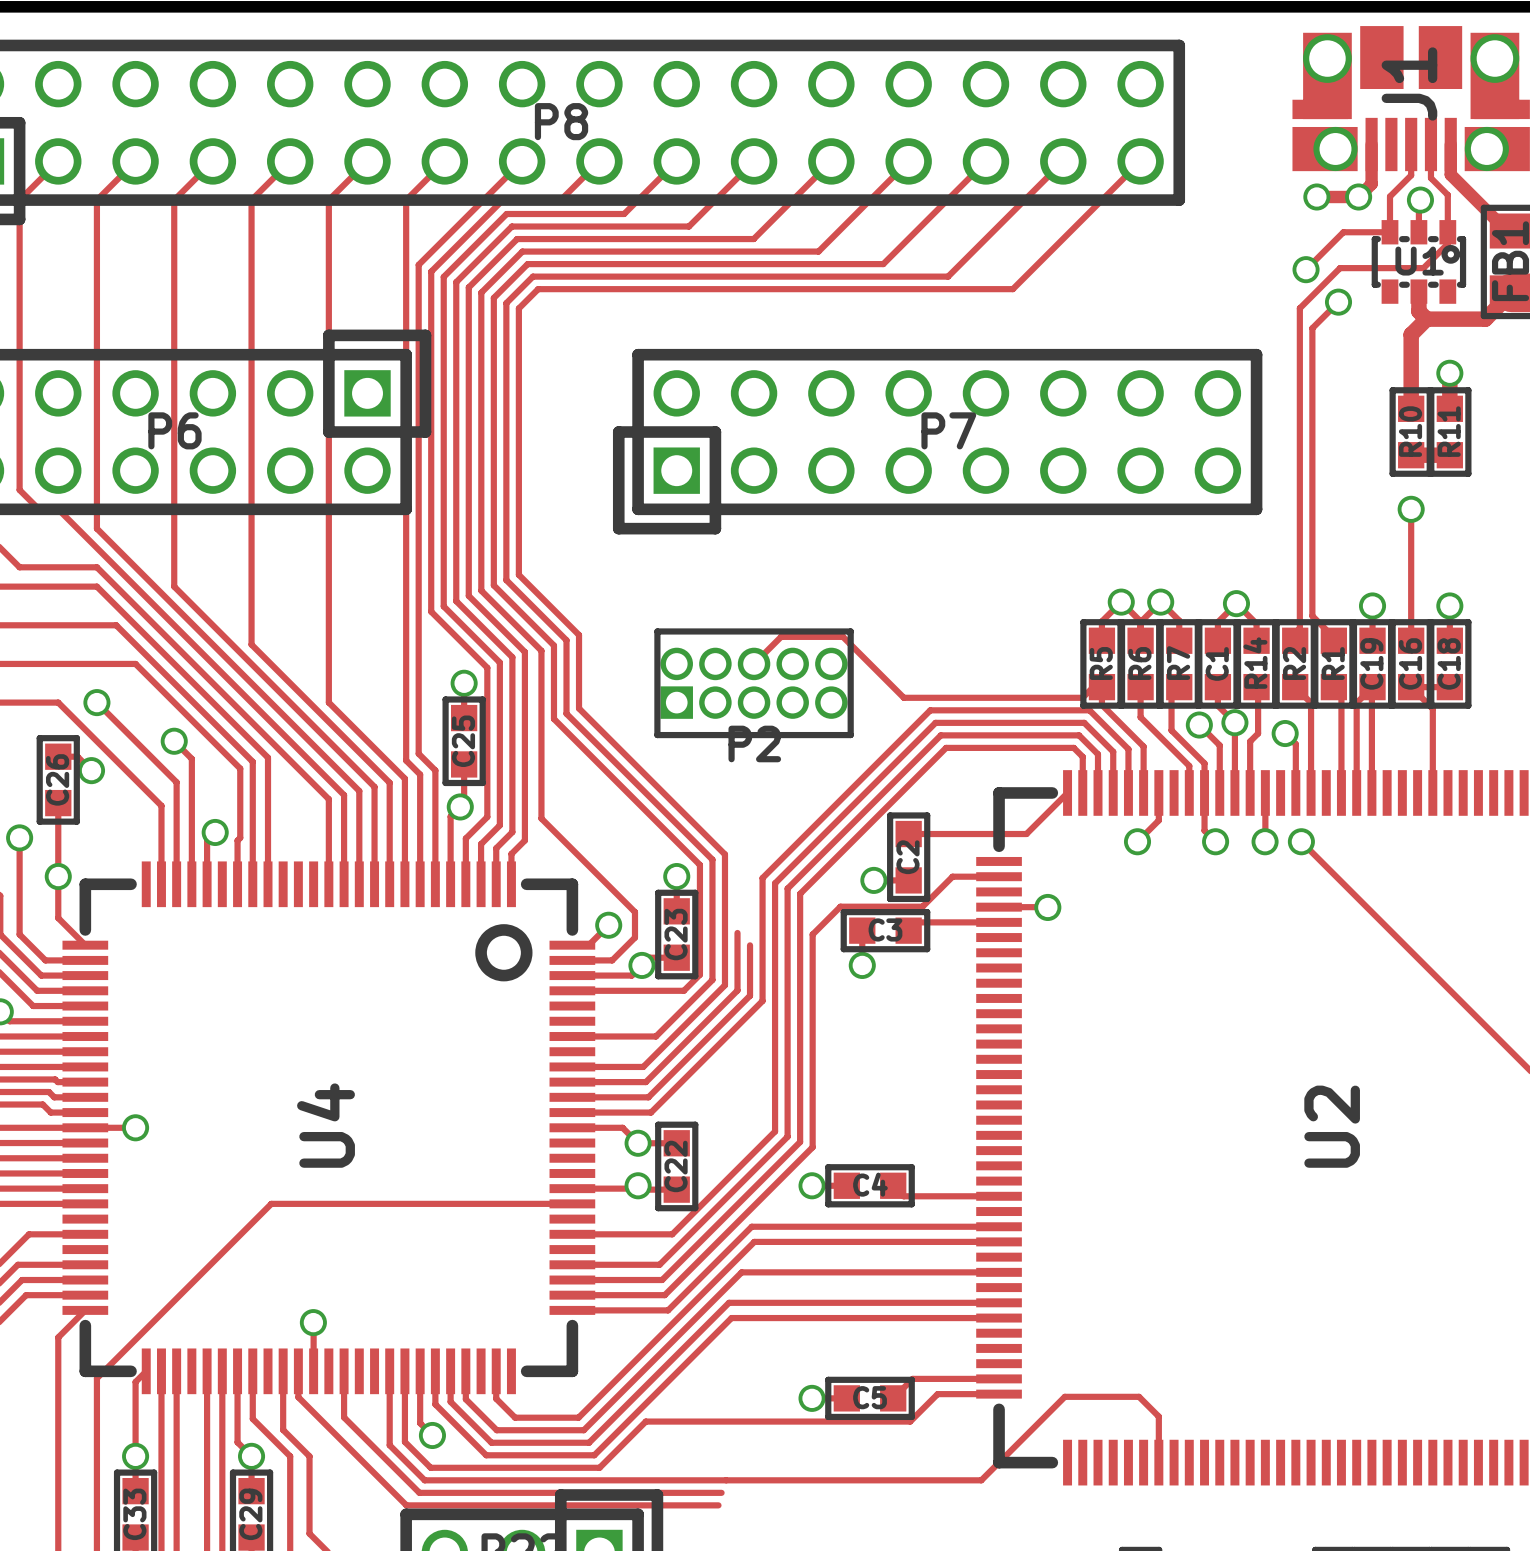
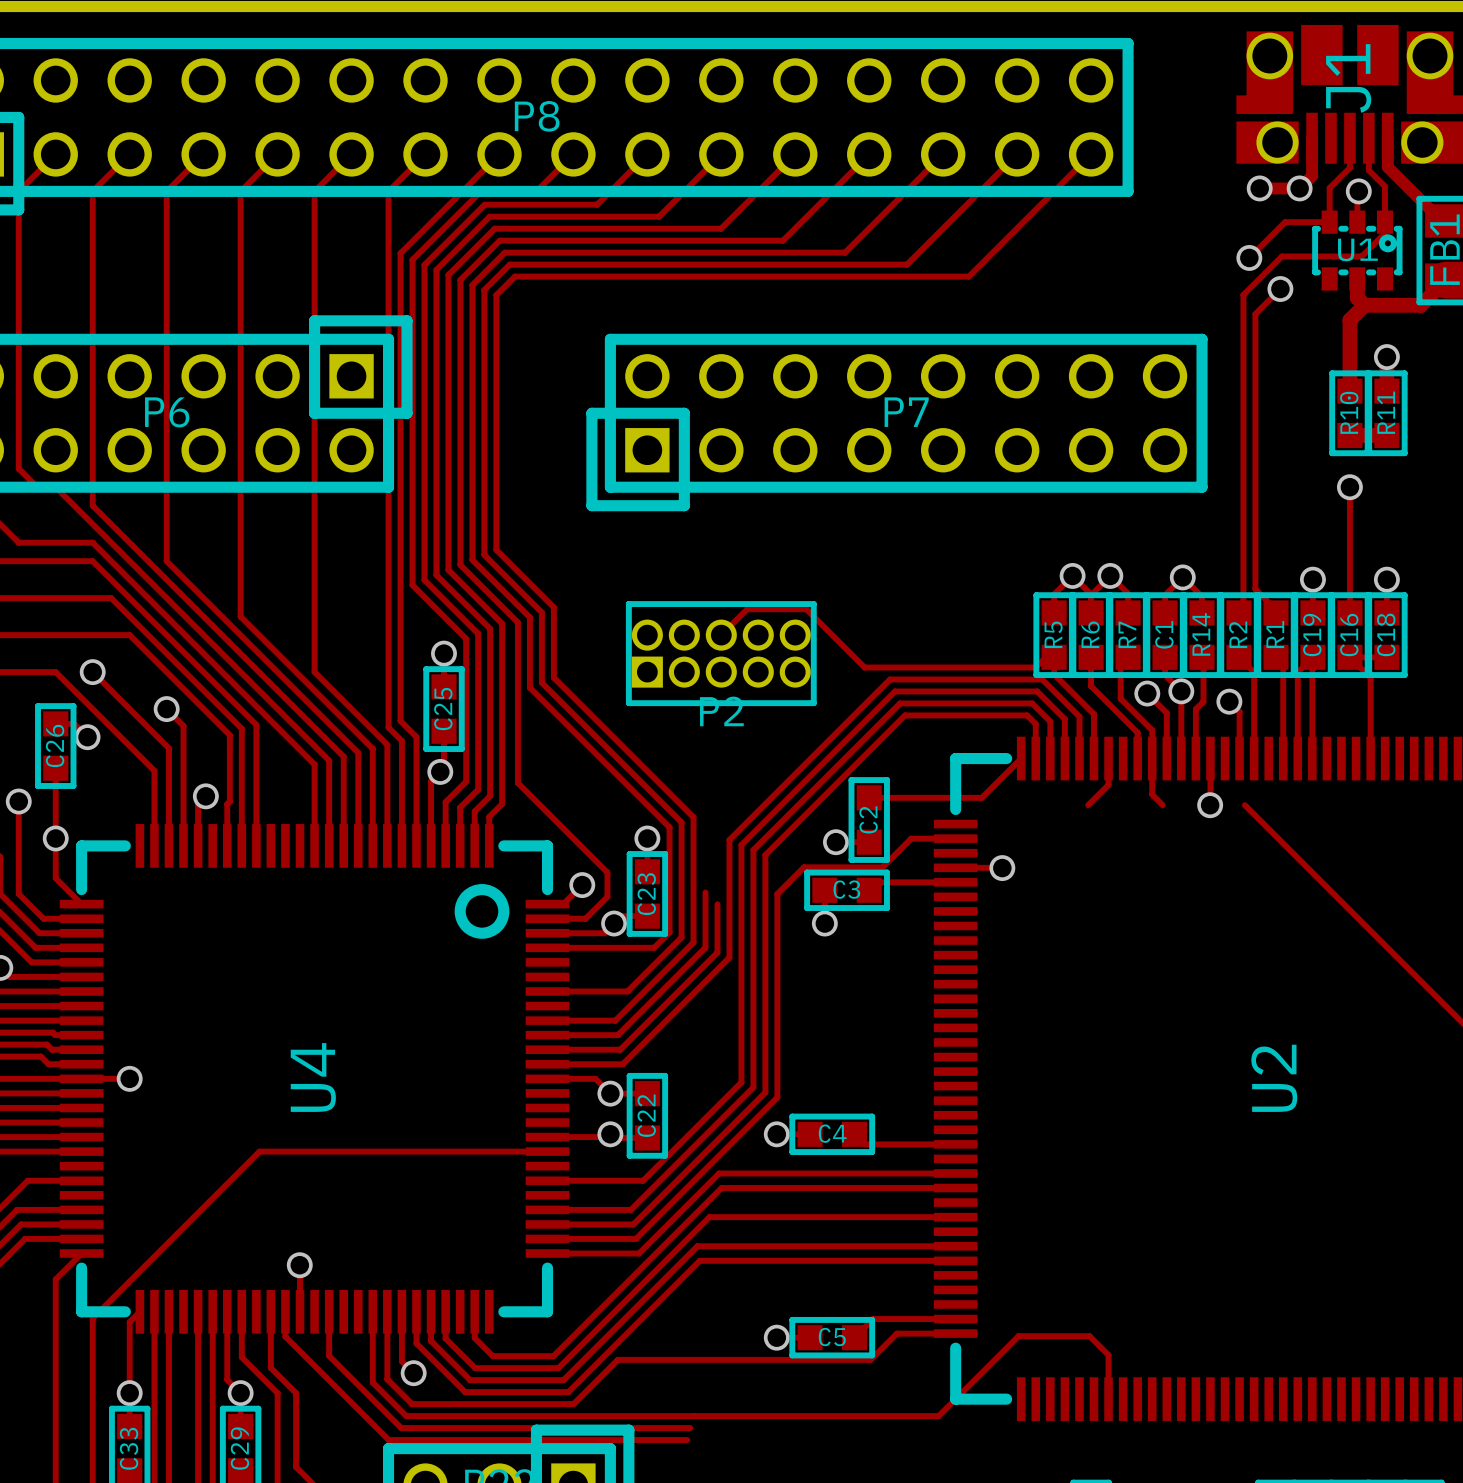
via: (1137, 841) -> none
via: (1215, 841) -> none
via: (1301, 841) -> none

